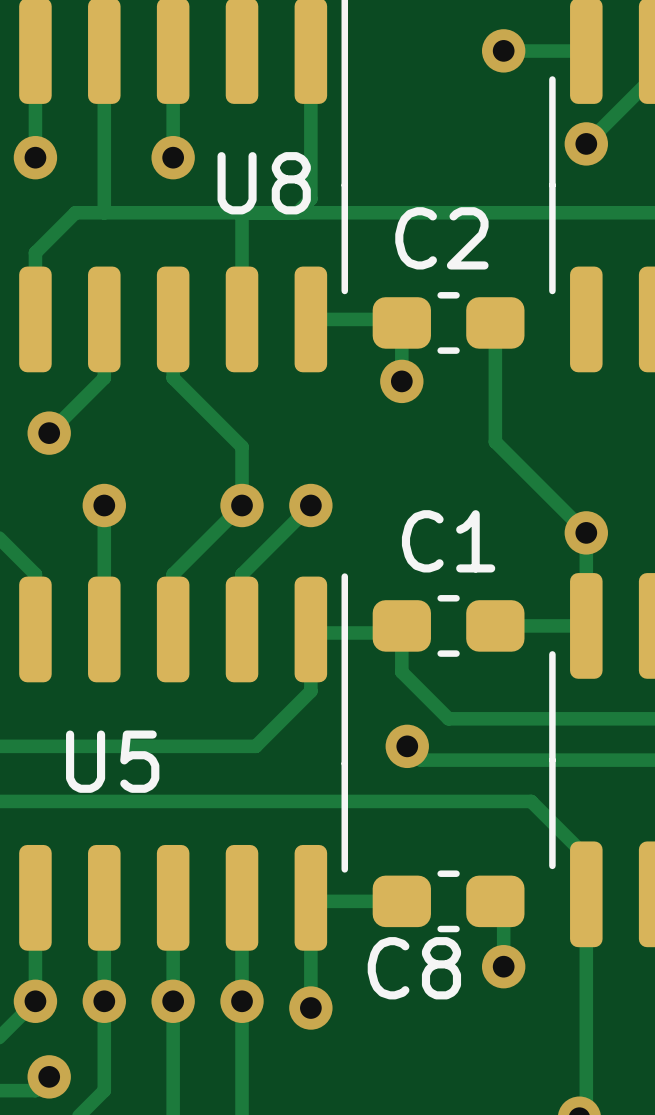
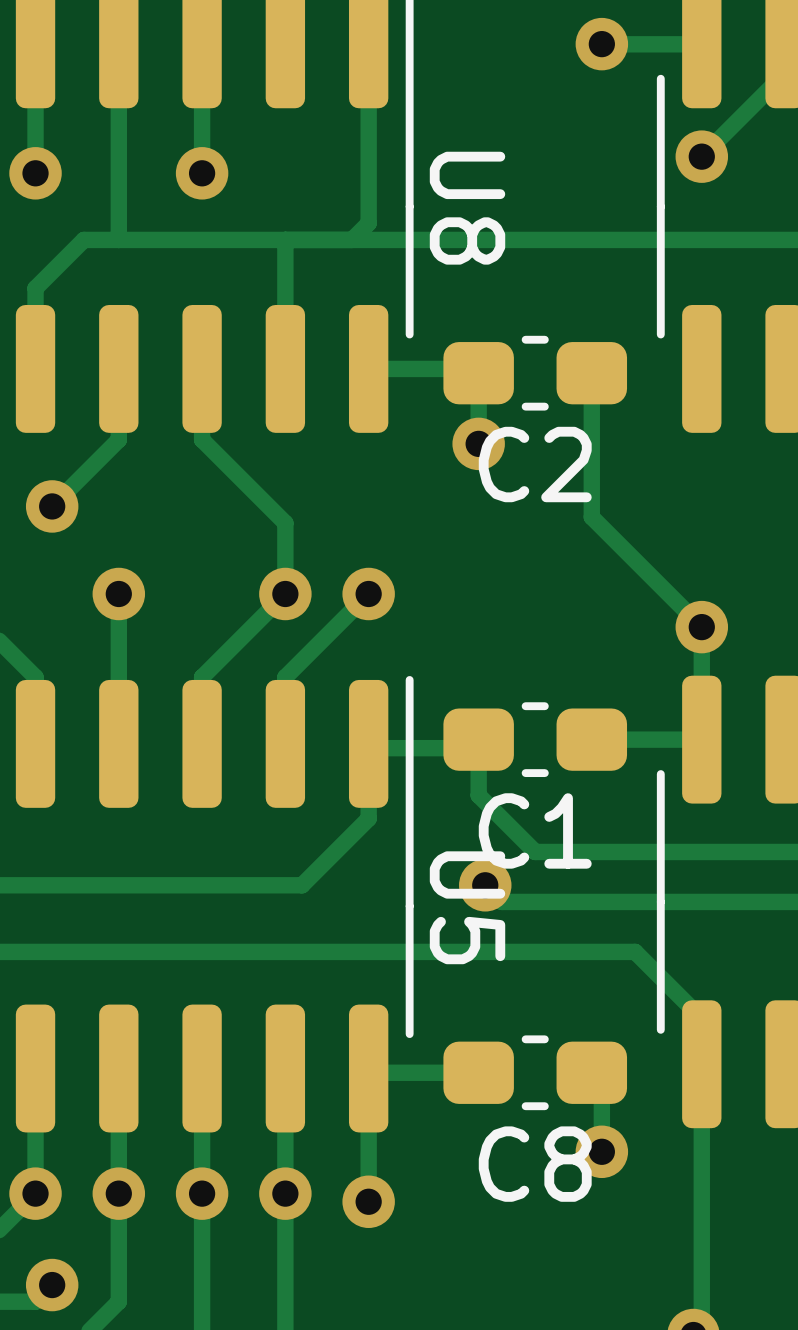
U8 name rotation: 0° (264, 183) -> 90° clockwise (467, 208)
C2 name position: C2 (441, 238) -> C2 (535, 464)
C1 name position: C1 (448, 541) -> C1 (535, 830)
U5 name rotation: 0° (112, 761) -> 90° clockwise (467, 907)
U5 name position: U5 (112, 761) -> U5 (467, 907)
C8 name position: C8 (414, 968) -> C8 (535, 1164)

